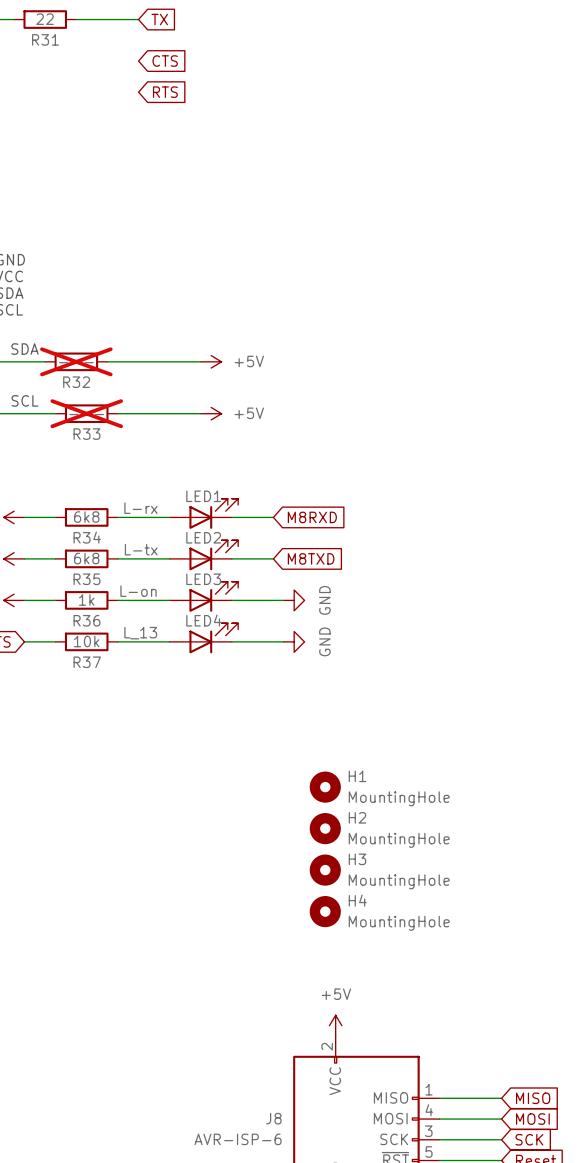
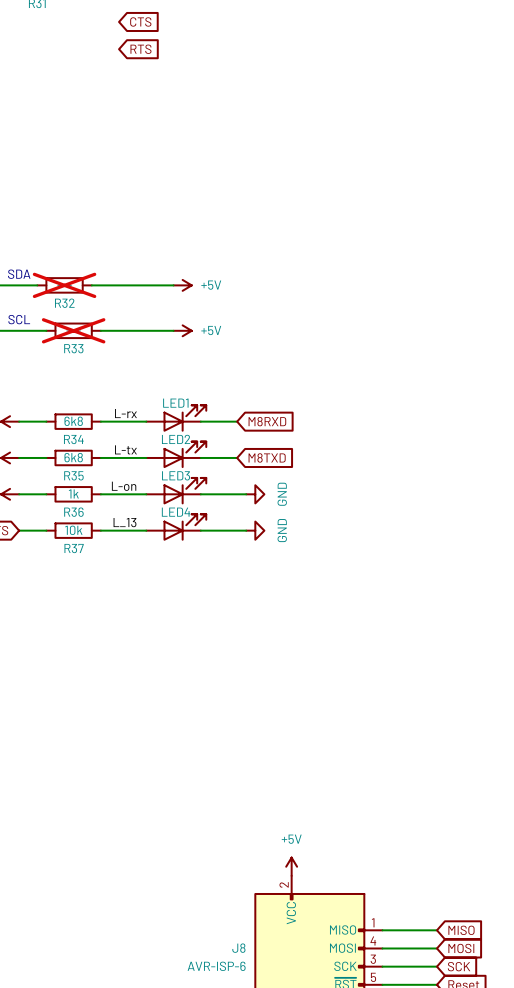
H1: MountingHole (325, 787) -> none
H2: MountingHole (325, 828) -> none
H3: MountingHole (325, 870) -> none
H4: MountingHole (325, 911) -> none

